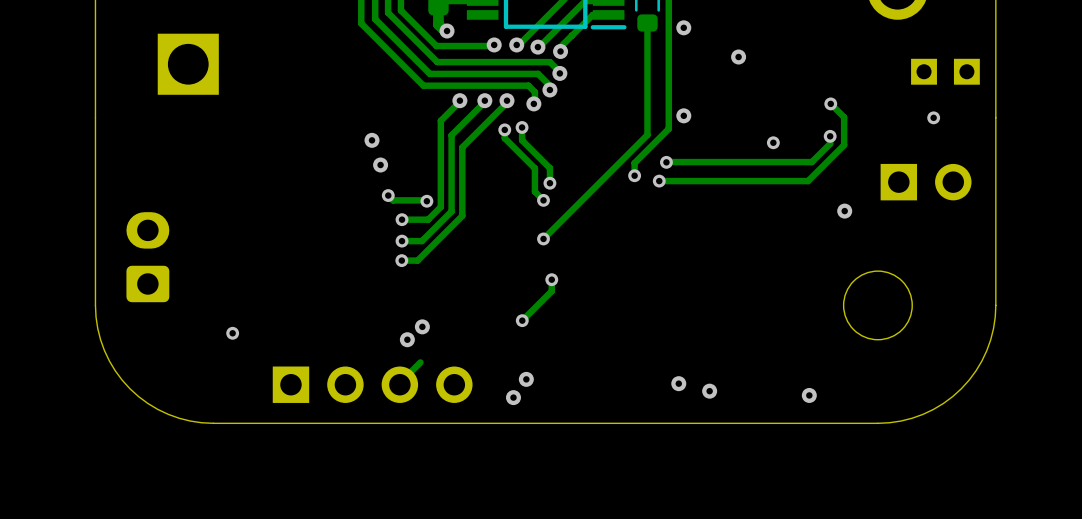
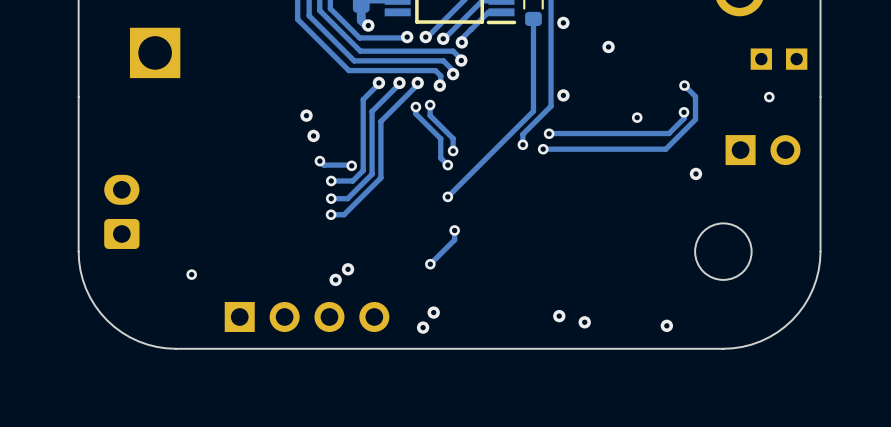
track: (420, 362) (404, 378) -> none

